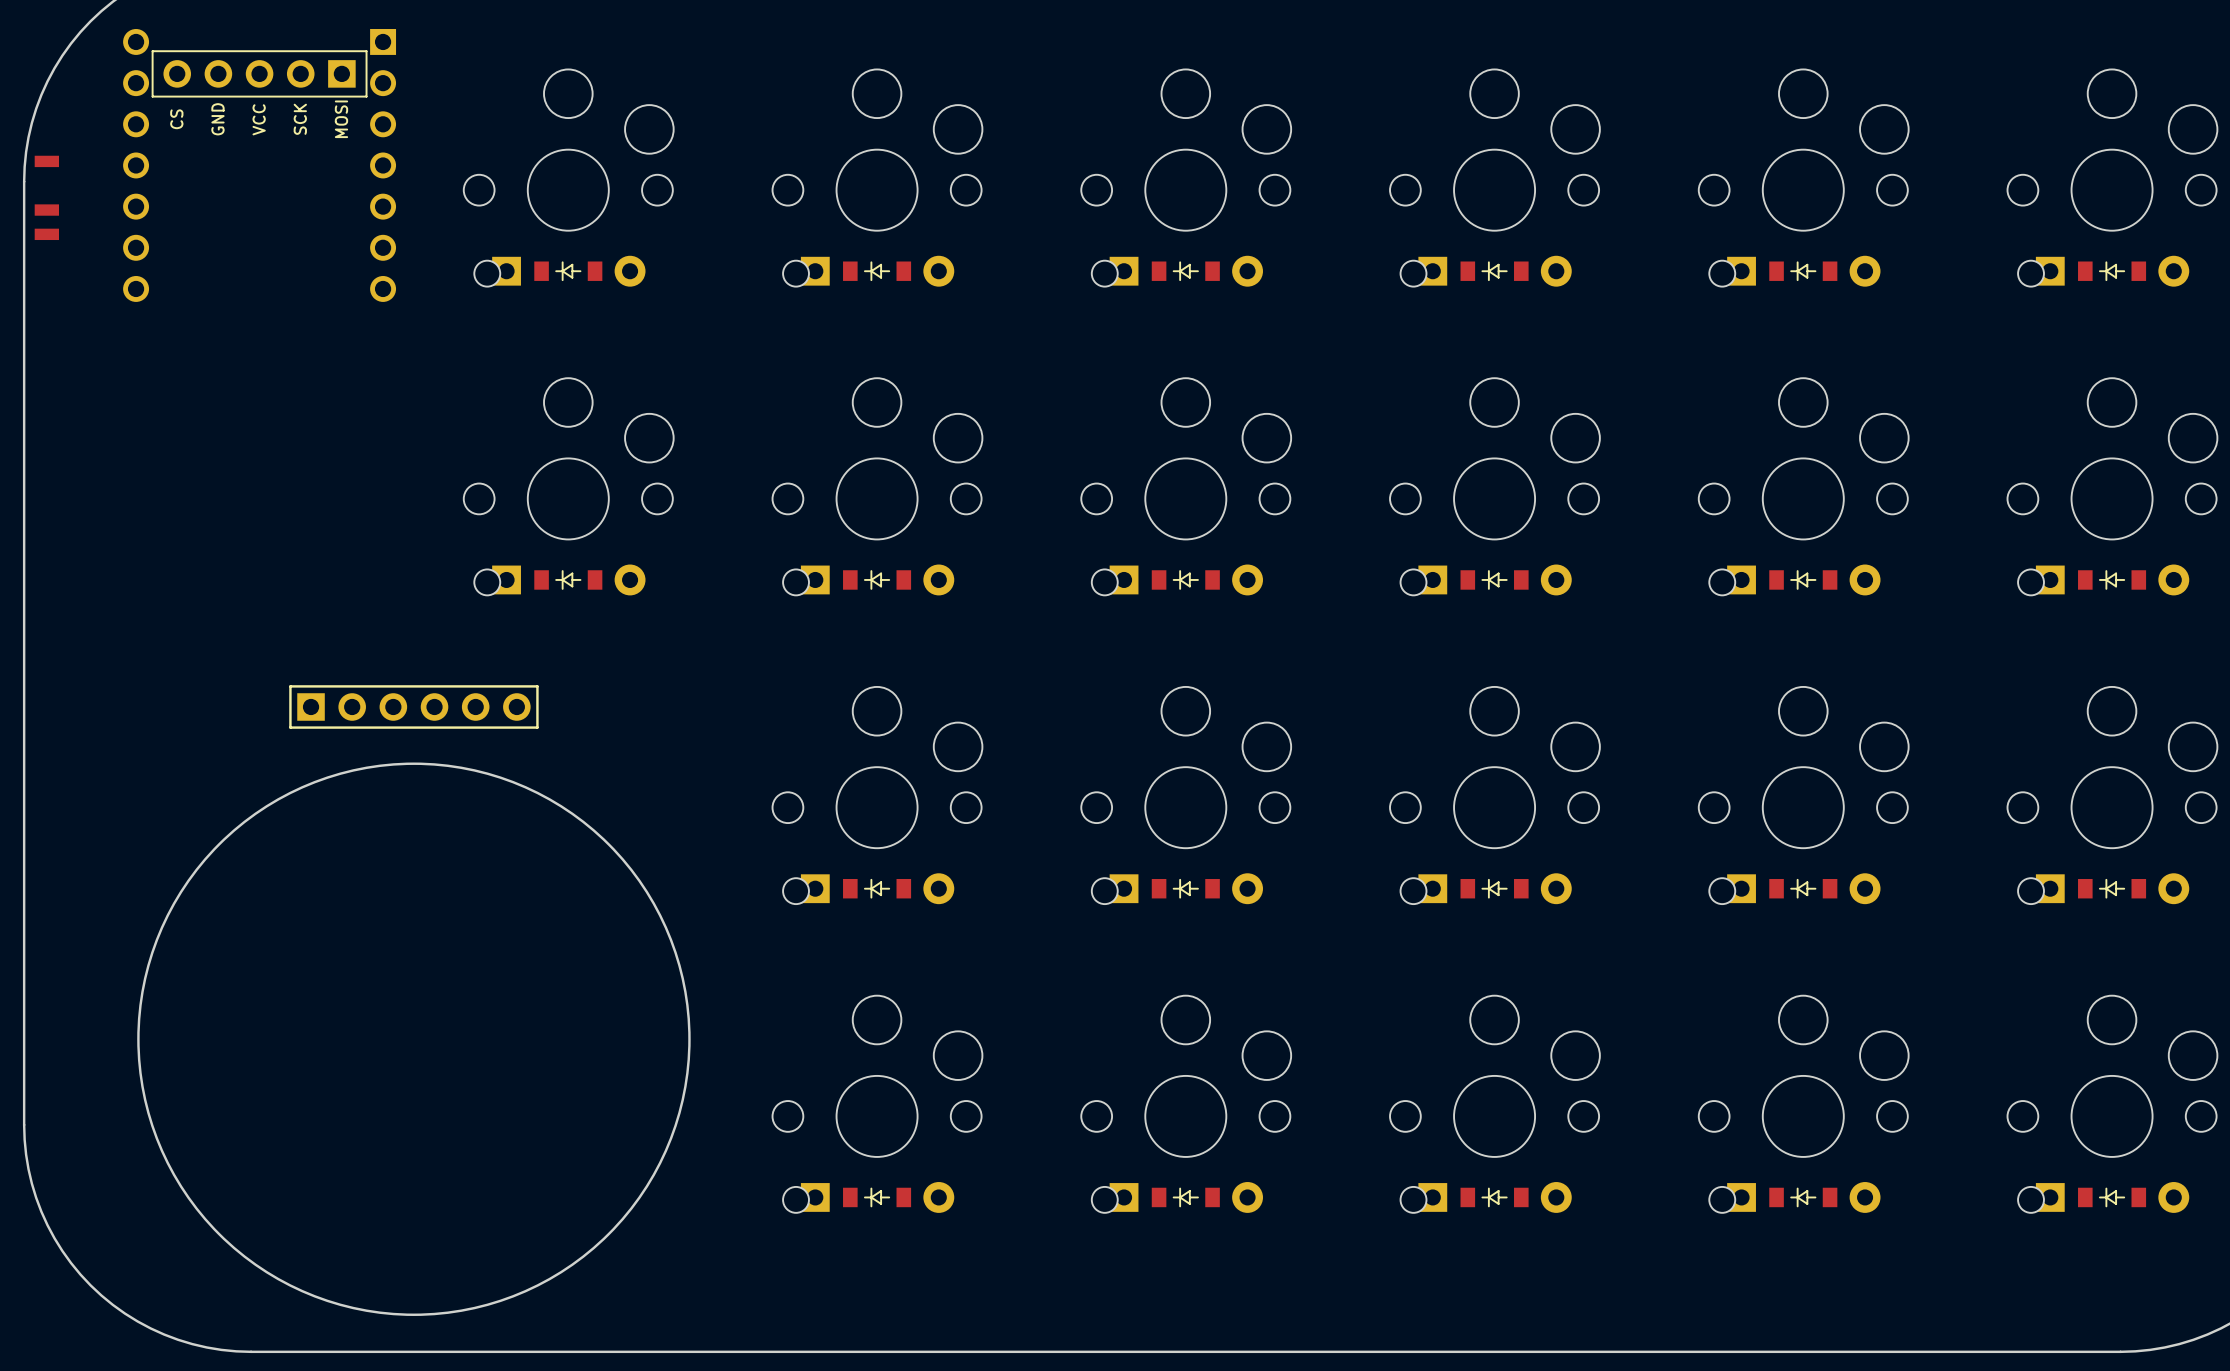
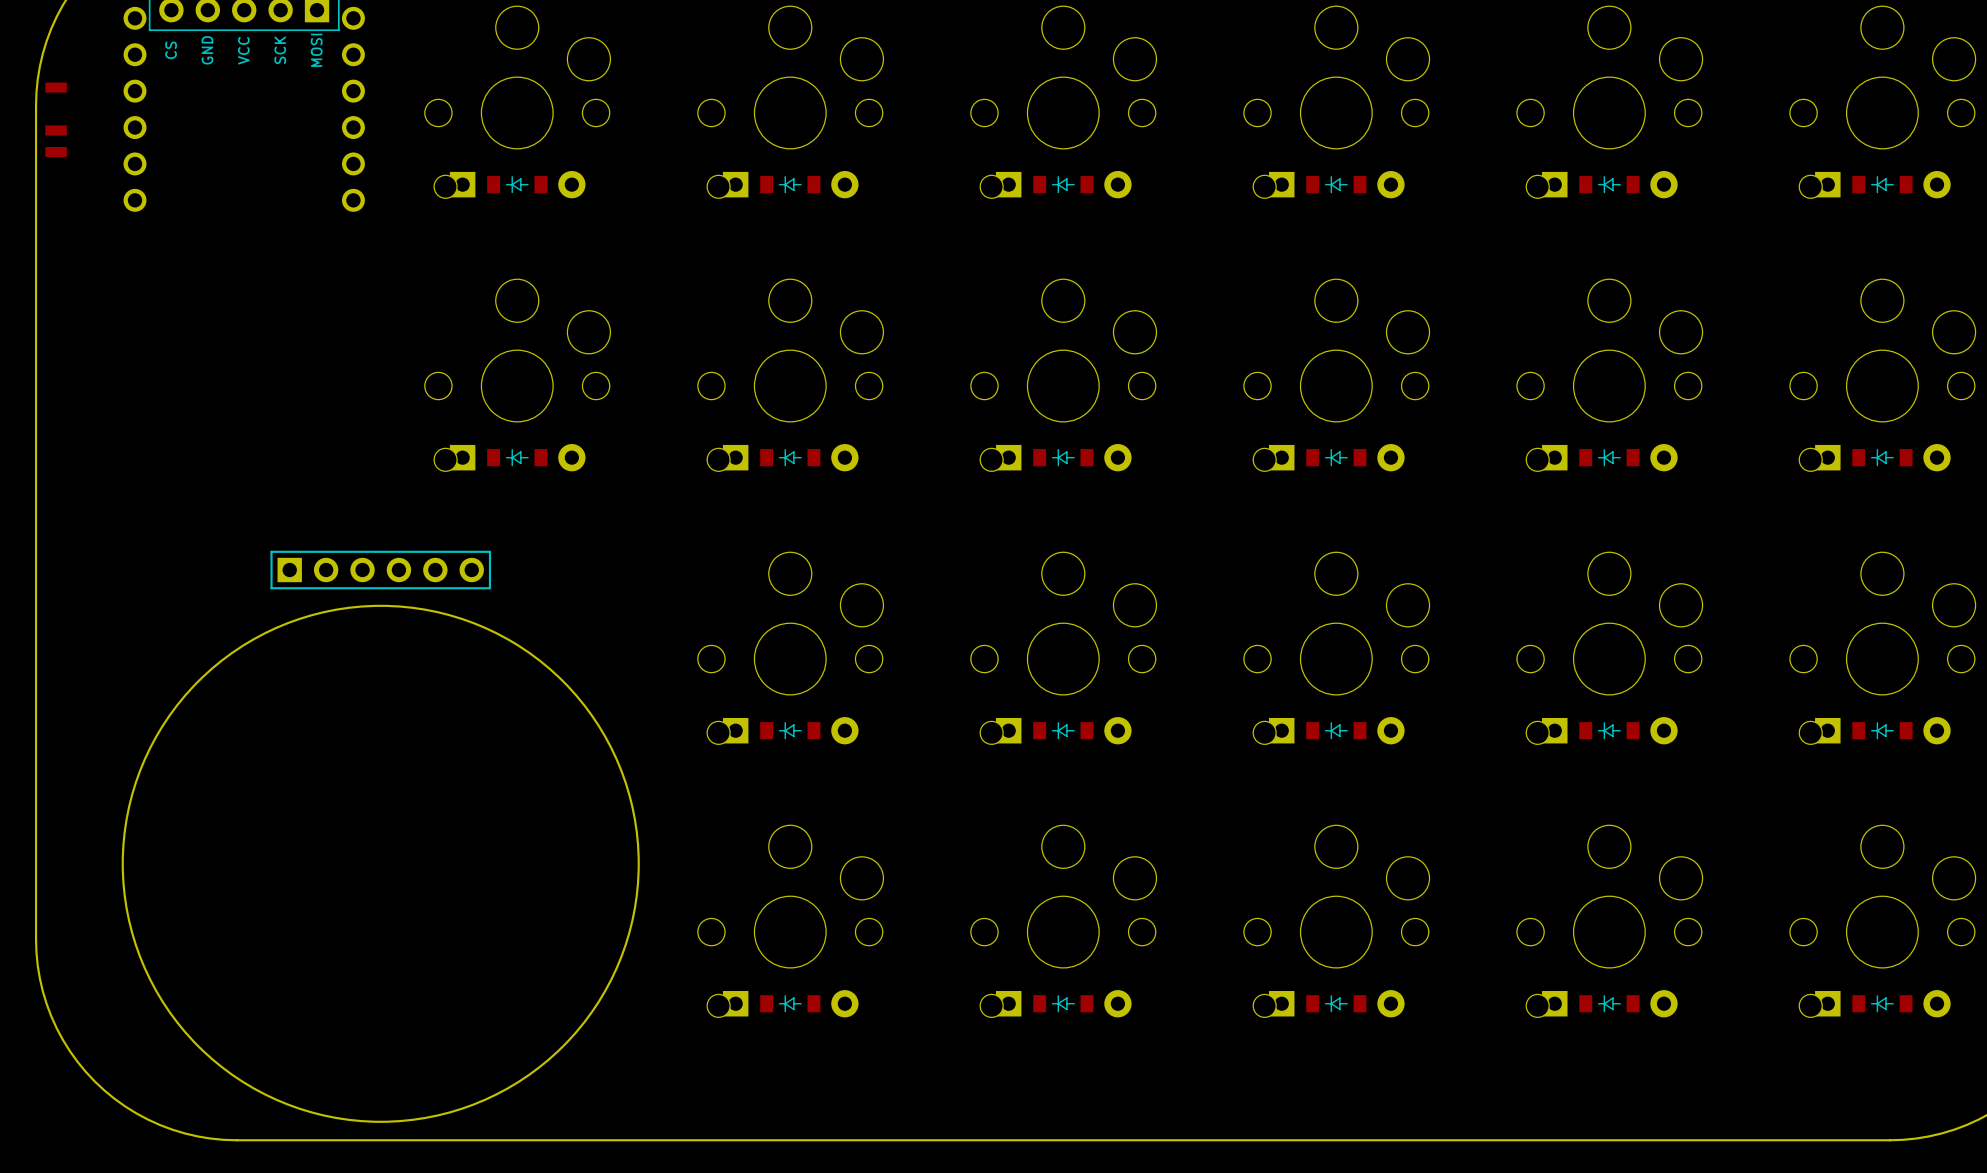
round board edge size: [137, 762, 691, 1316] -> [121, 604, 640, 1123]

